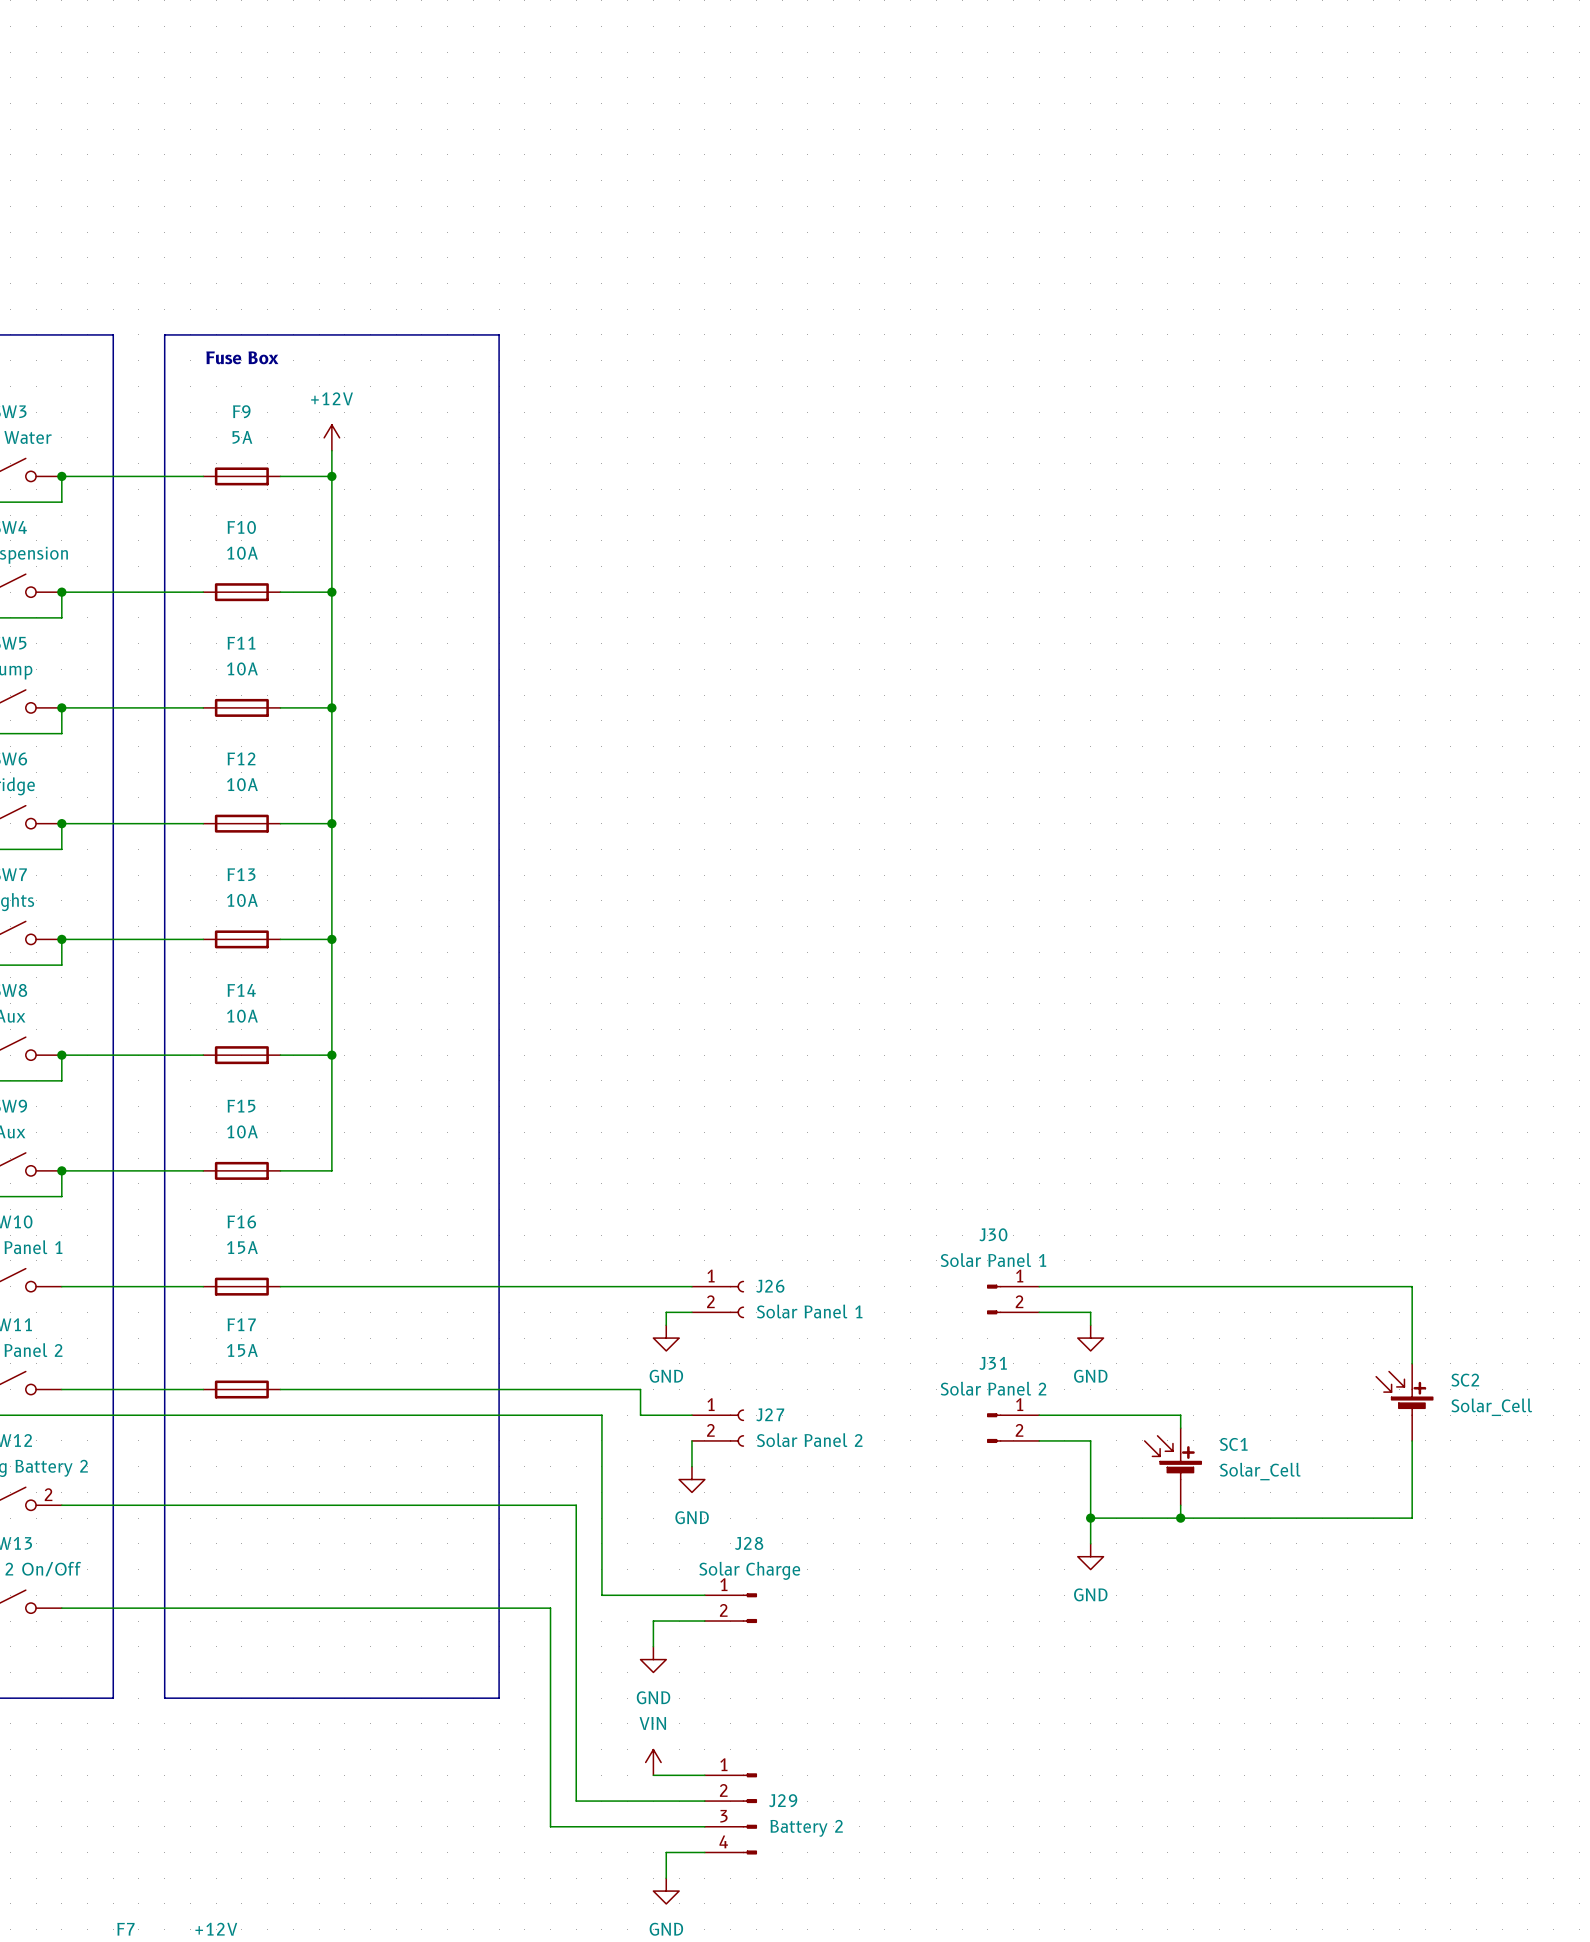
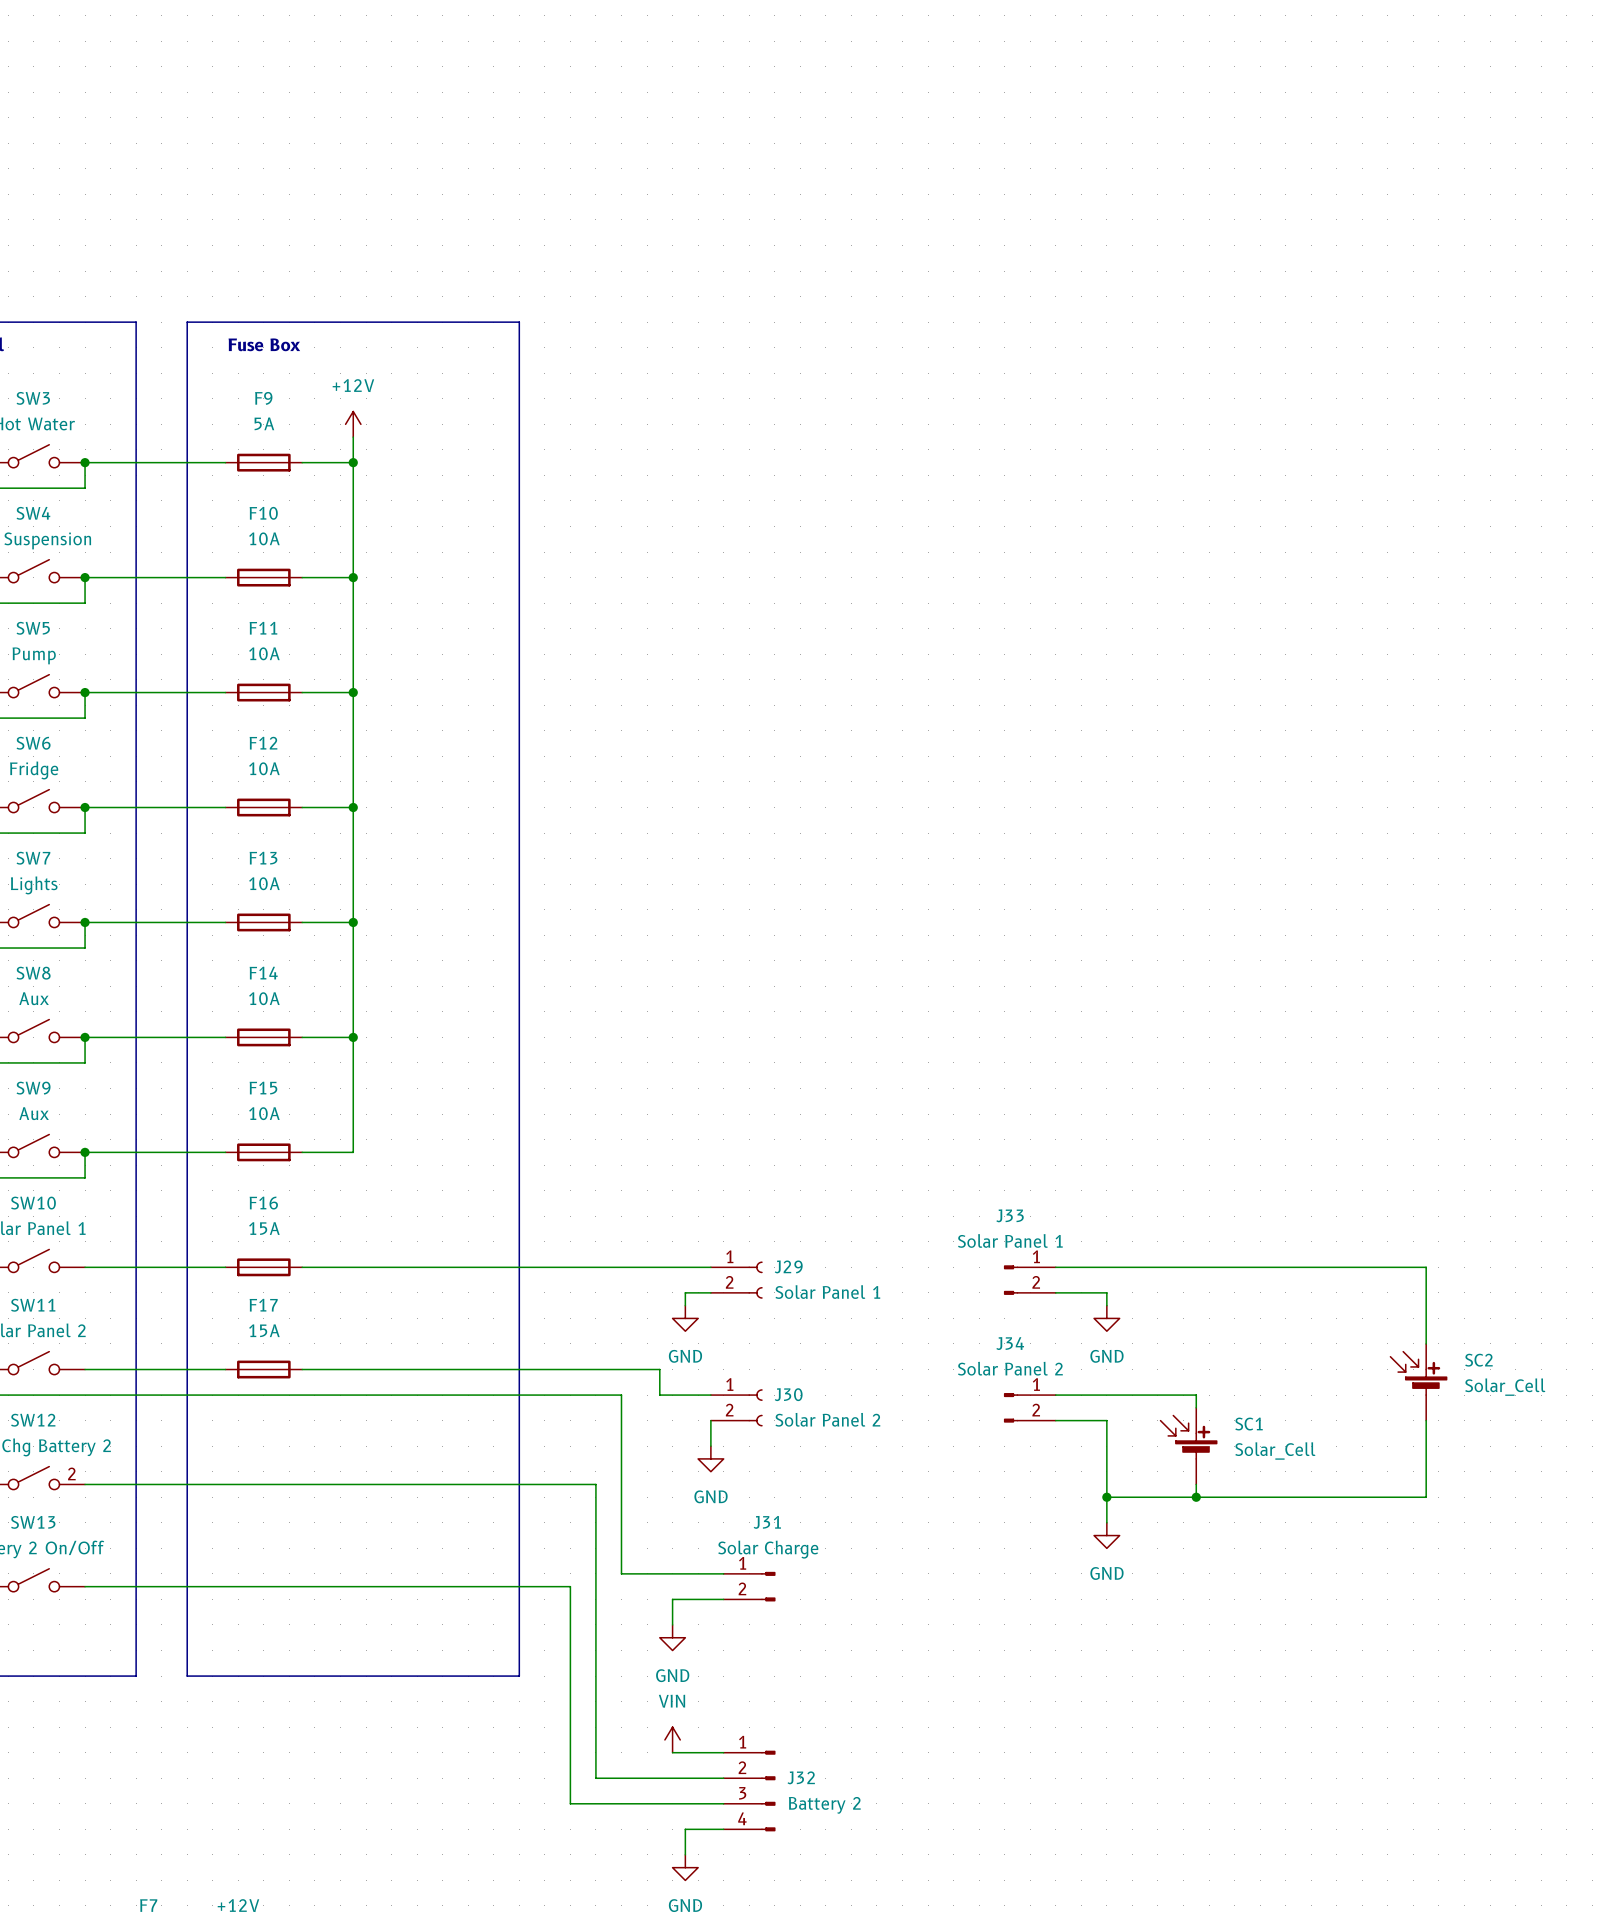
J30 name: J30 (993, 1234) -> J33 (1010, 1215)
J26 name: J26 (770, 1286) -> J29 (788, 1266)
J31 name: J31 (993, 1363) -> J34 (1010, 1343)
J27 name: J27 (770, 1414) -> J30 (788, 1394)
J28 name: J28 (749, 1543) -> J31 (767, 1522)
J29 name: J29 (783, 1800) -> J32 (801, 1777)

